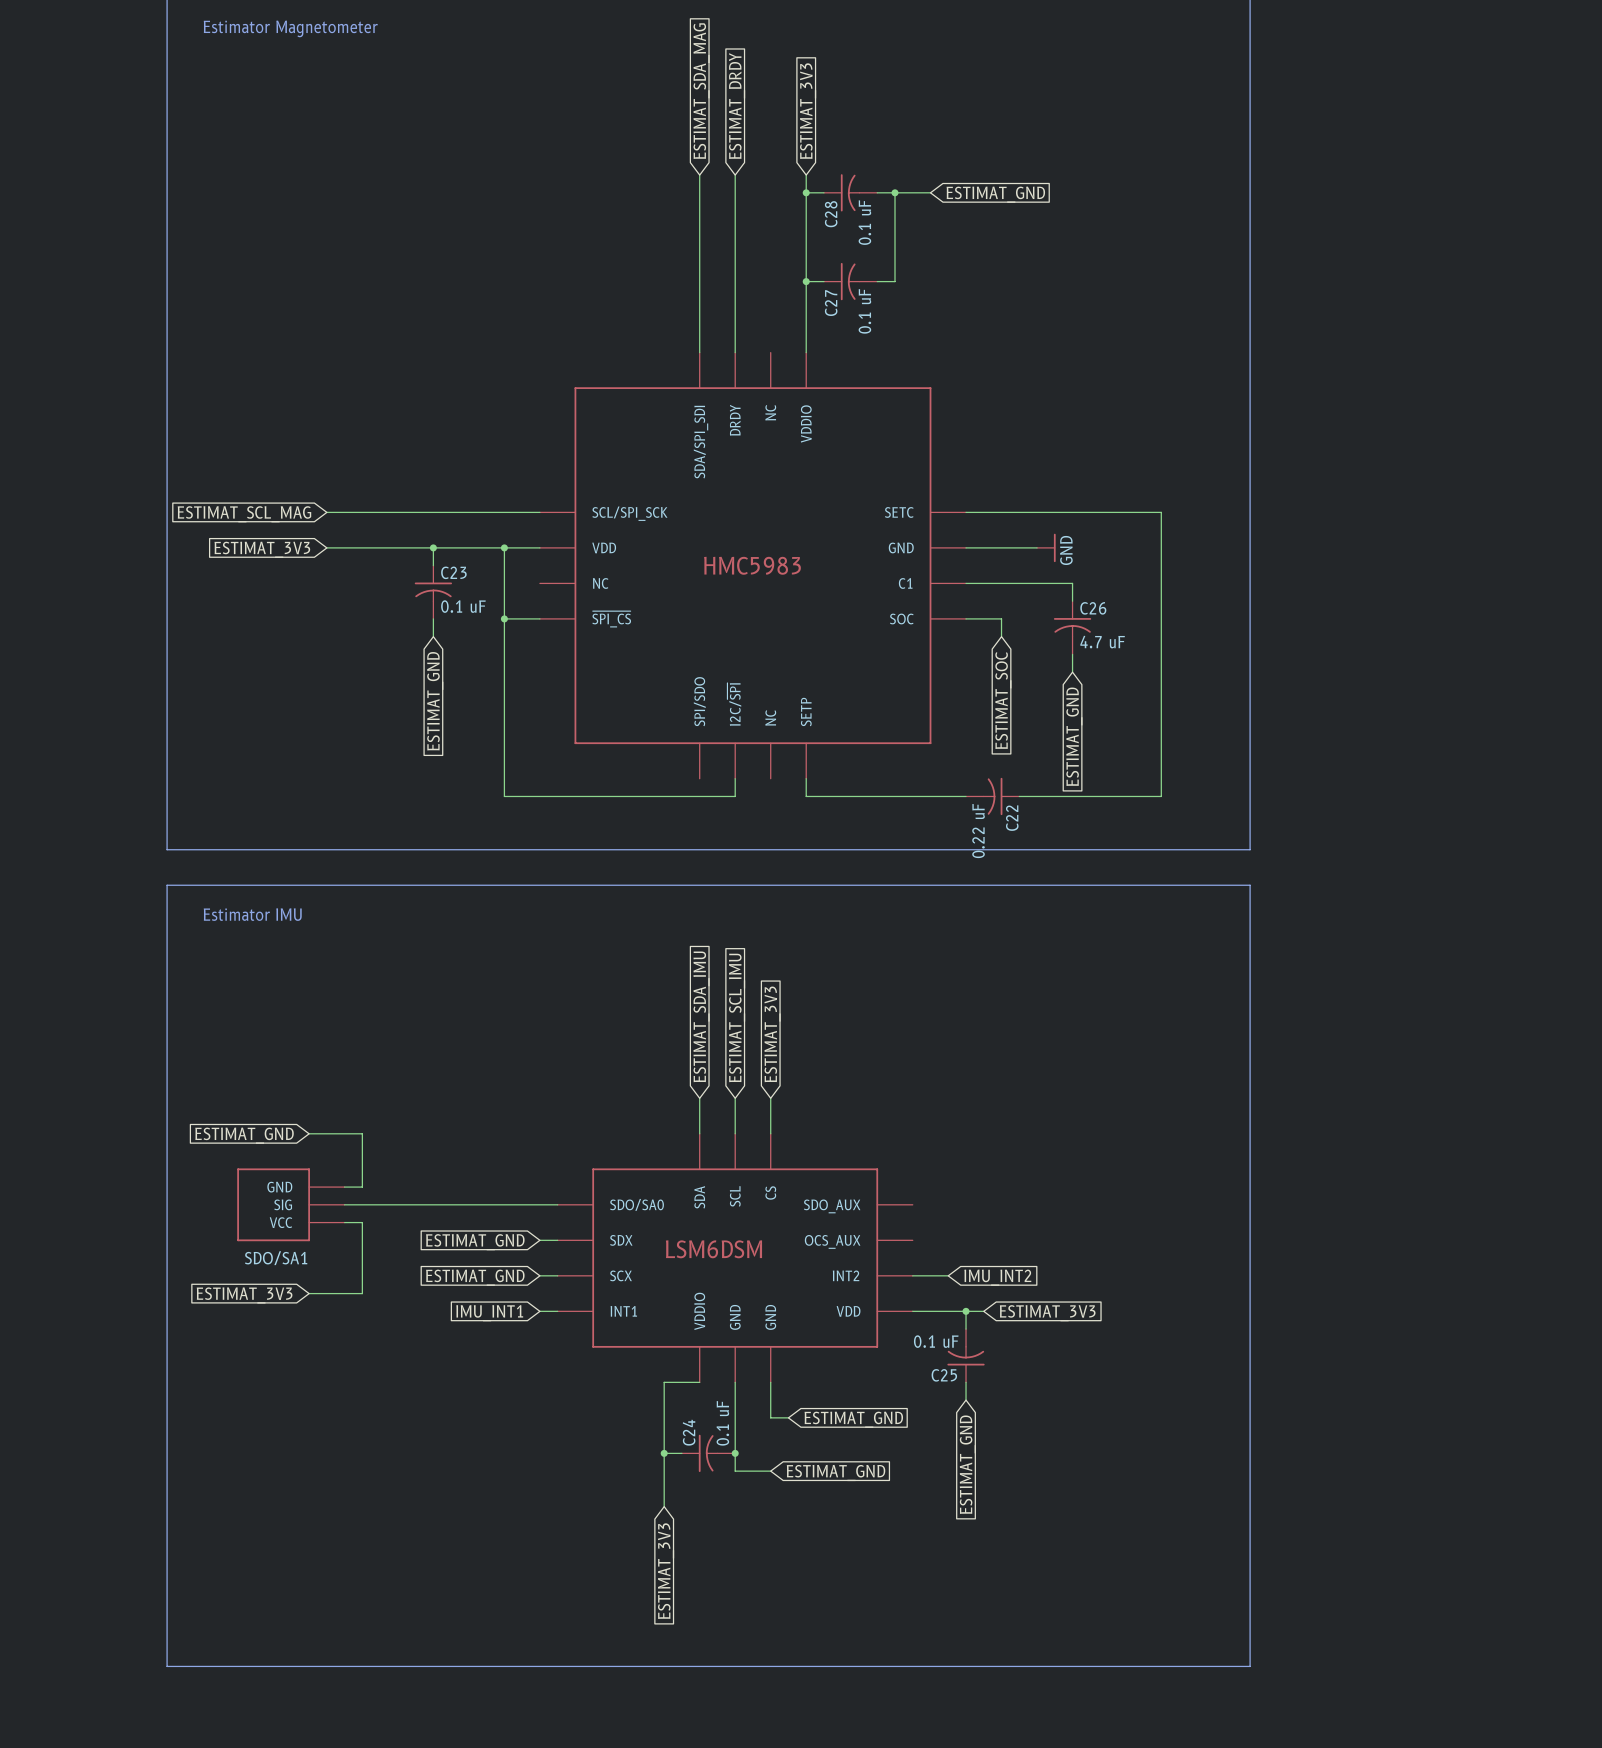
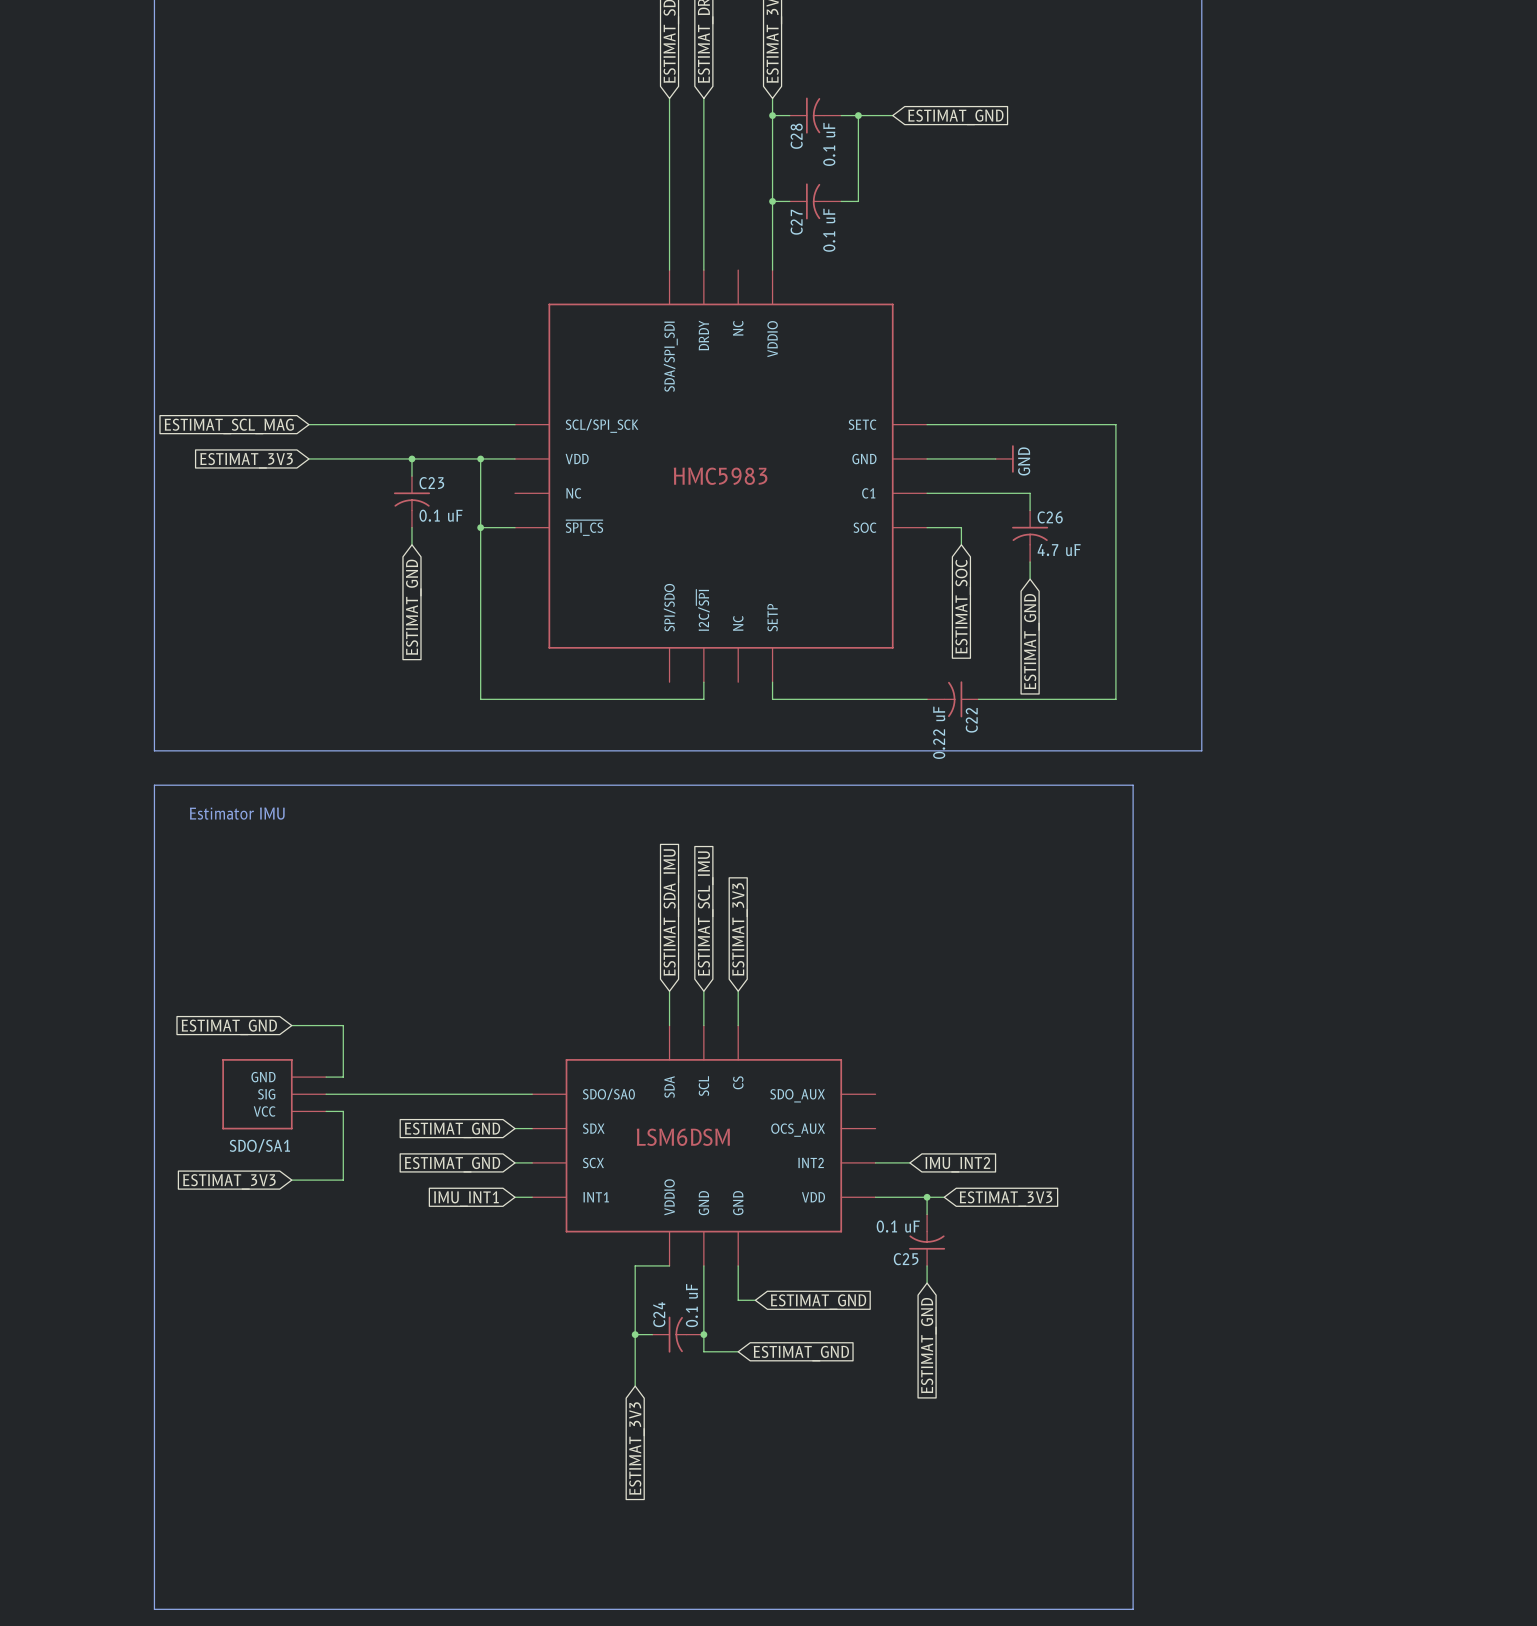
line: (1179, 885) (1250, 885) (1250, 1666) (167, 1666) -> (1133, 785) (1133, 1609) (154, 1609) (154, 1540)

